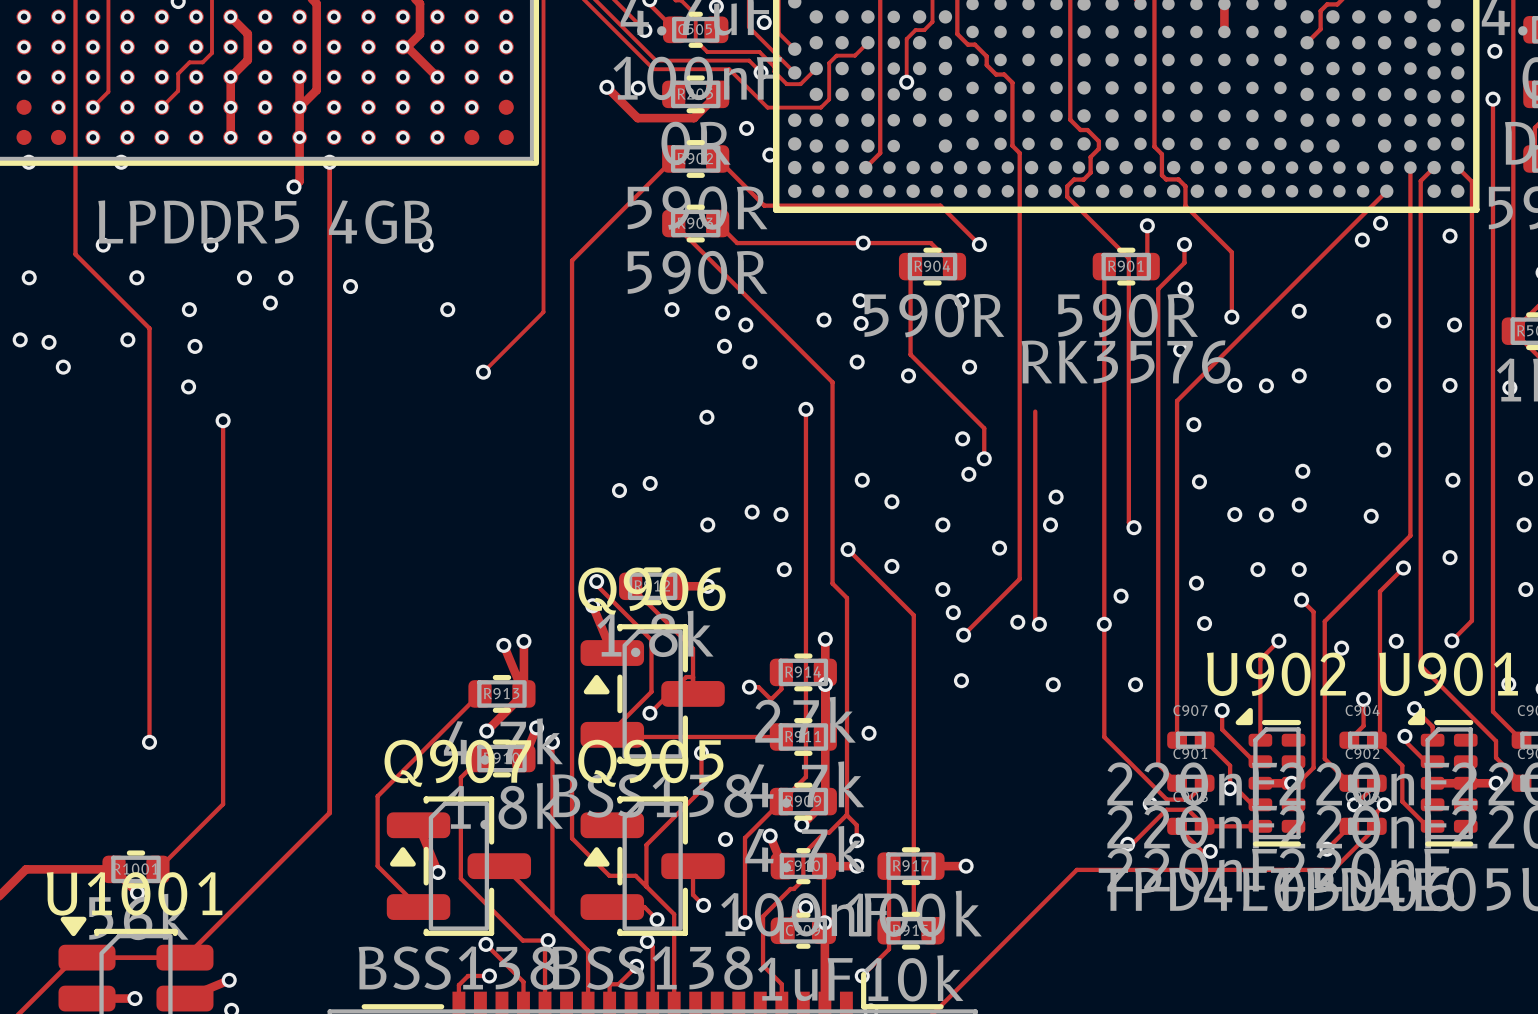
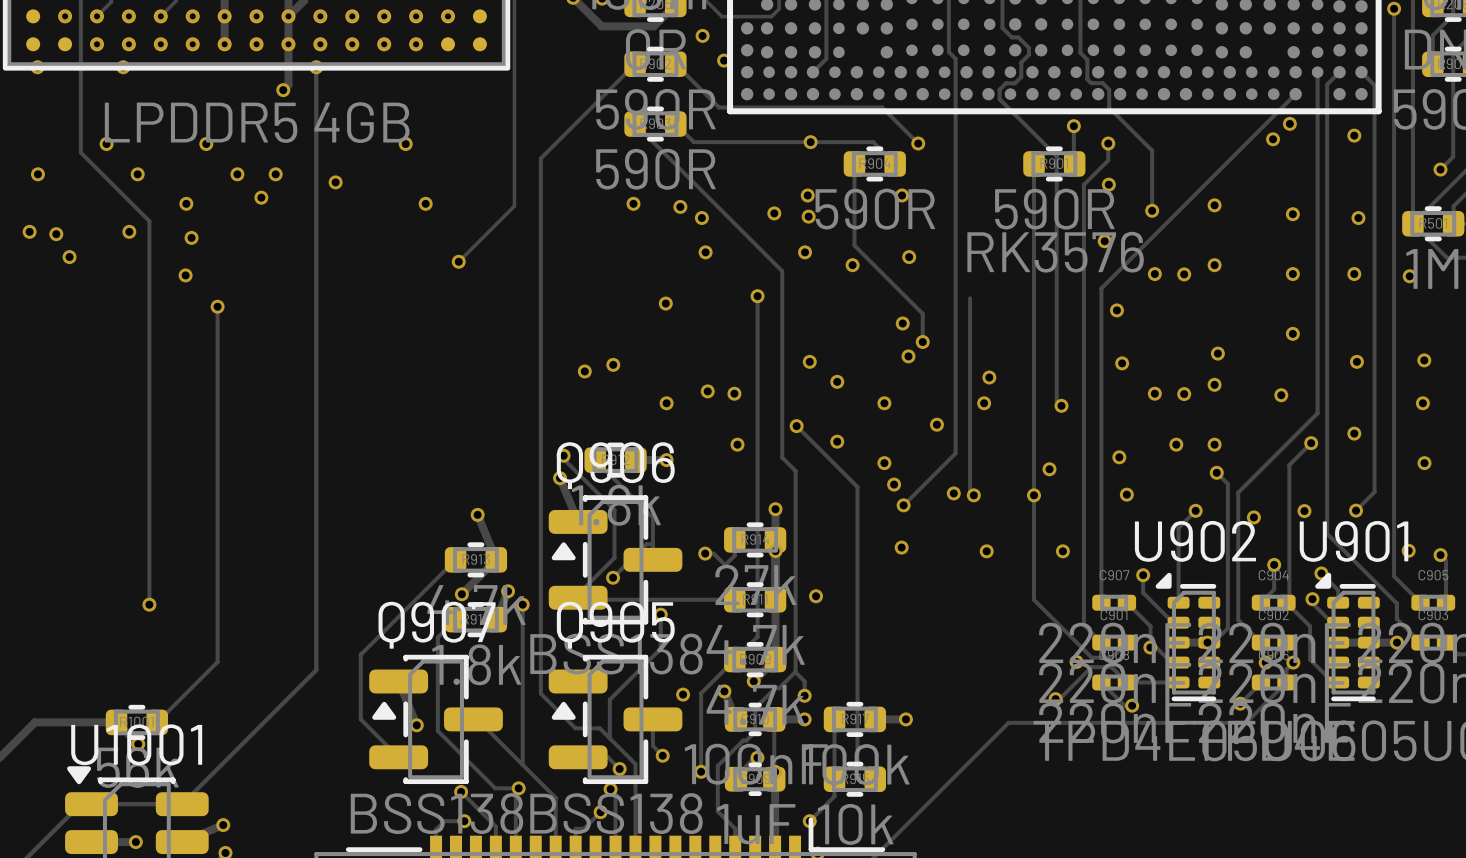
via: (724, 346) -> none
track: (523, 641) (523, 693) -> none
via: (523, 641) -> none

